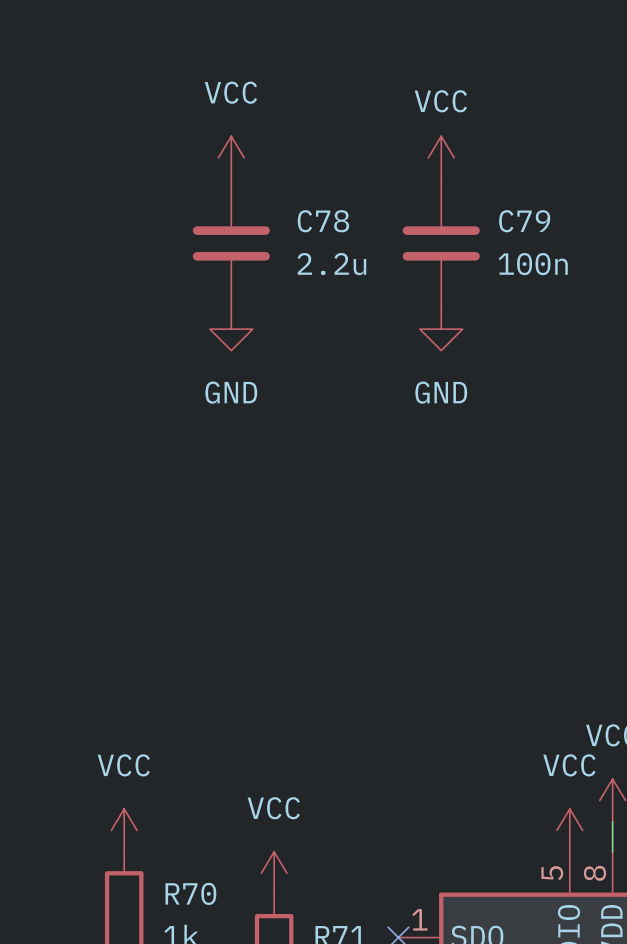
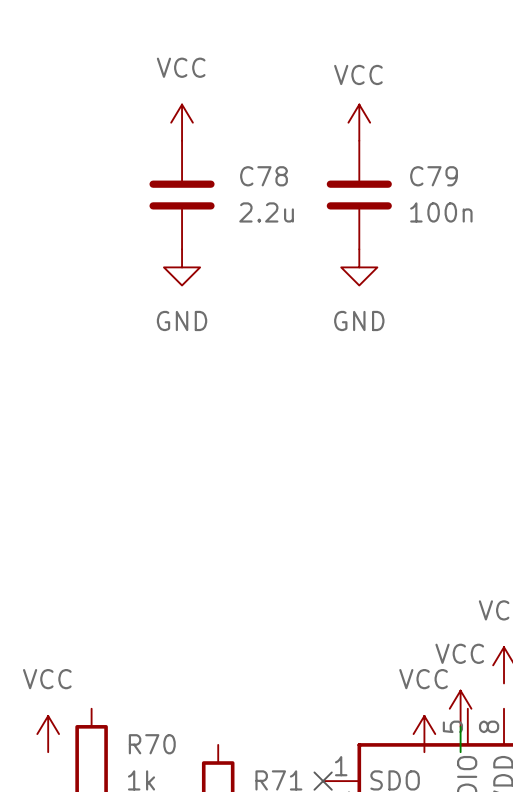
wire: (612, 821) (612, 851) -> (460, 726) (460, 752)
power symbol position: VCC (124, 830) -> VCC (48, 734)
power symbol position: VCC (569, 830) -> VCC (460, 708)
power symbol: VCC (274, 873) -> none
power symbol: none -> VCC (424, 734)

